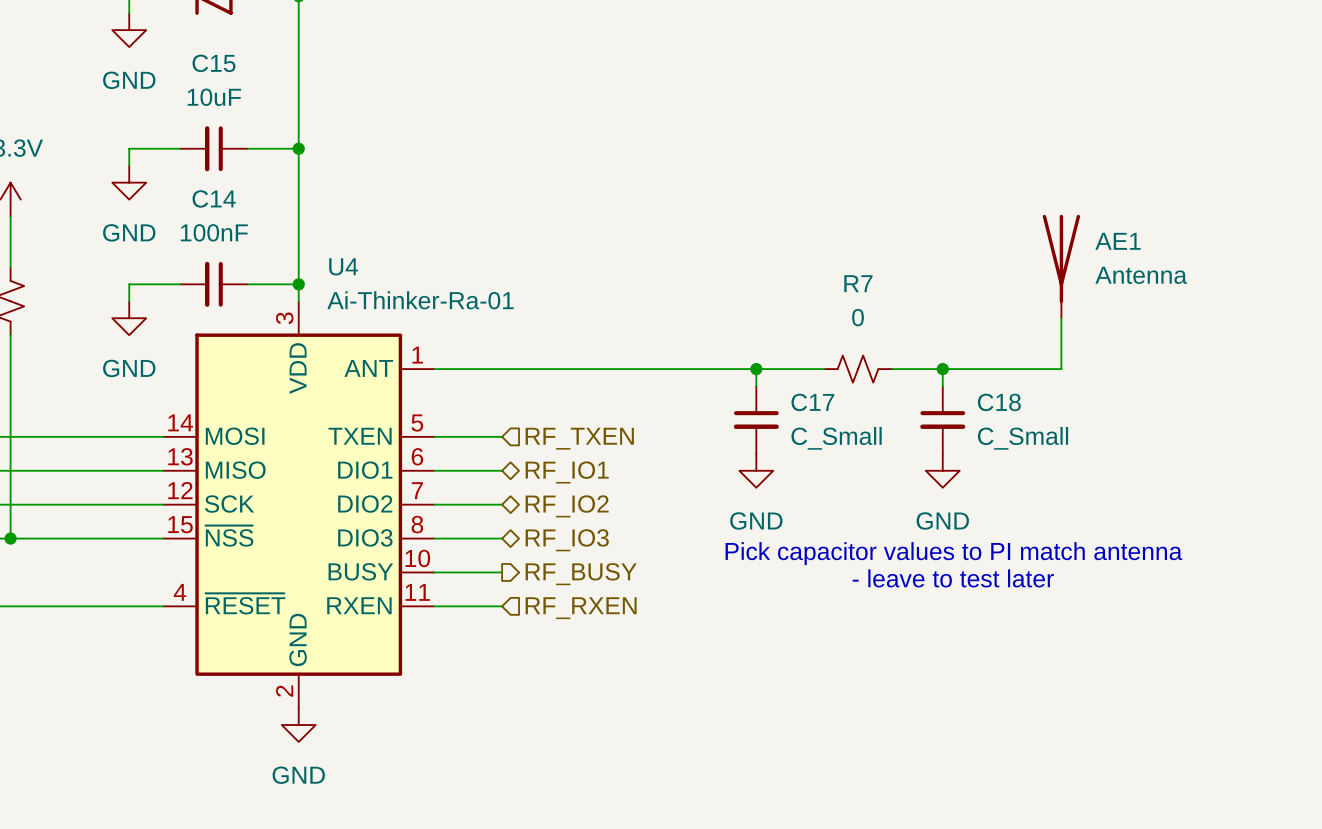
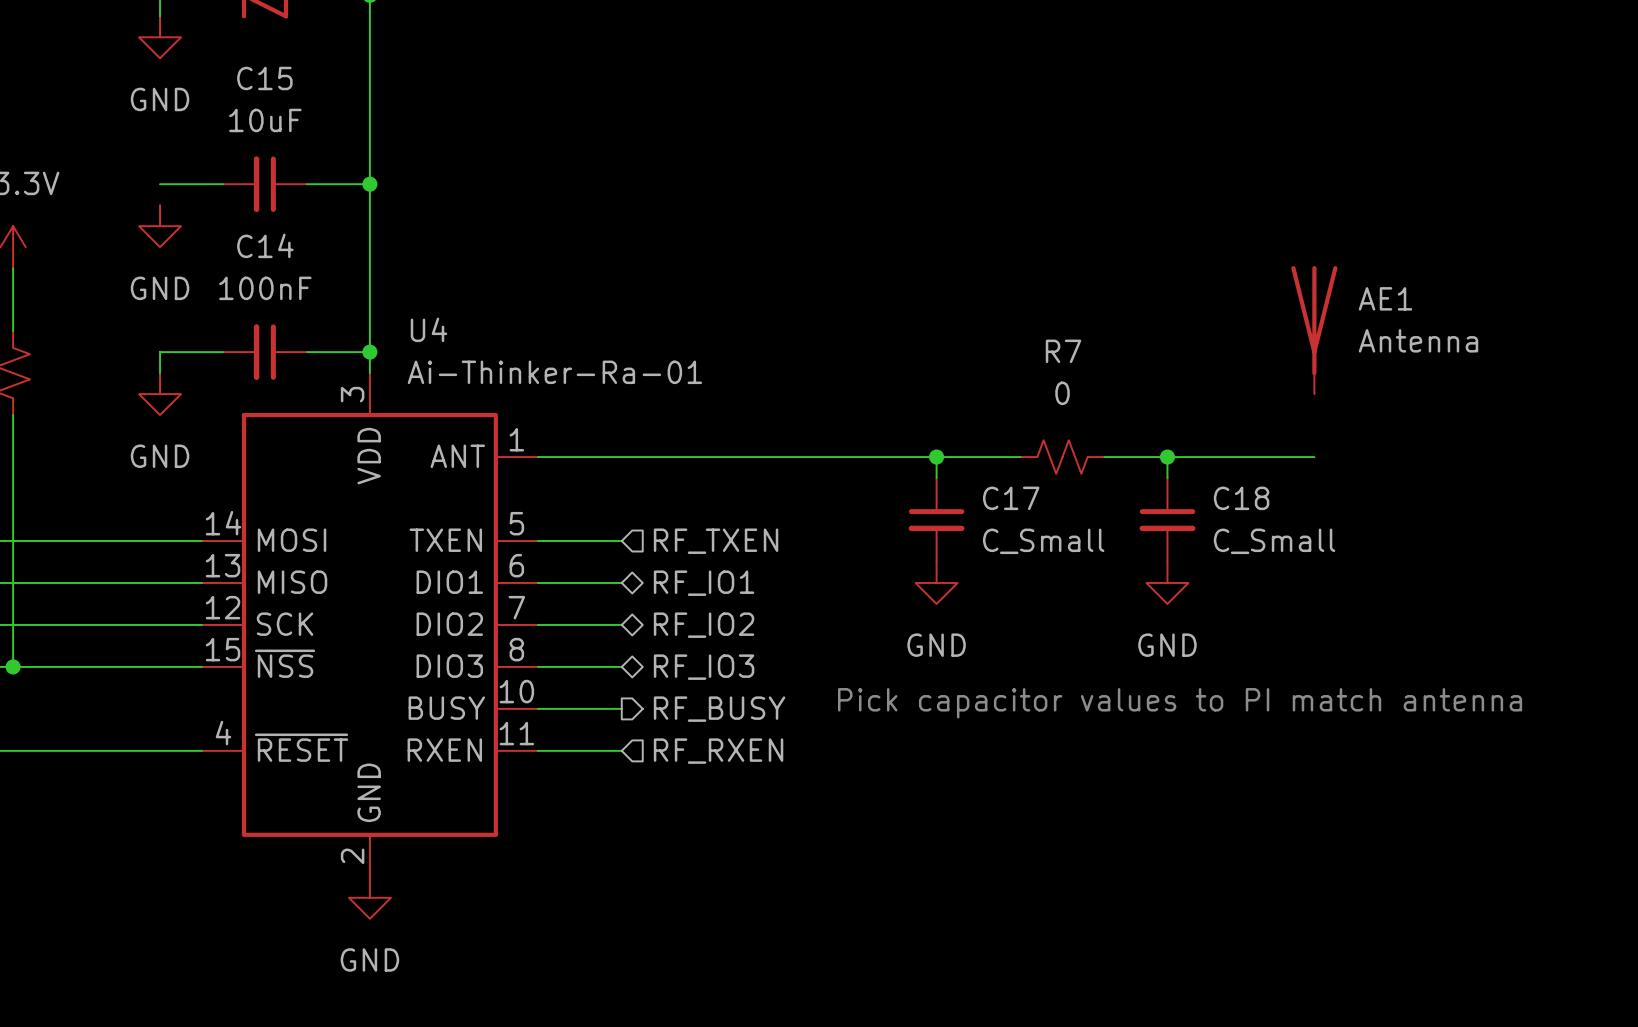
wire: (129, 148) (129, 165) -> none
wire: (1061, 318) (1061, 369) -> none
text position: Pick capacitor values to PI match antenna (953, 553) -> Pick capacitor values to PI match antenna (1180, 703)
text: - leave to test later (953, 578) -> none

